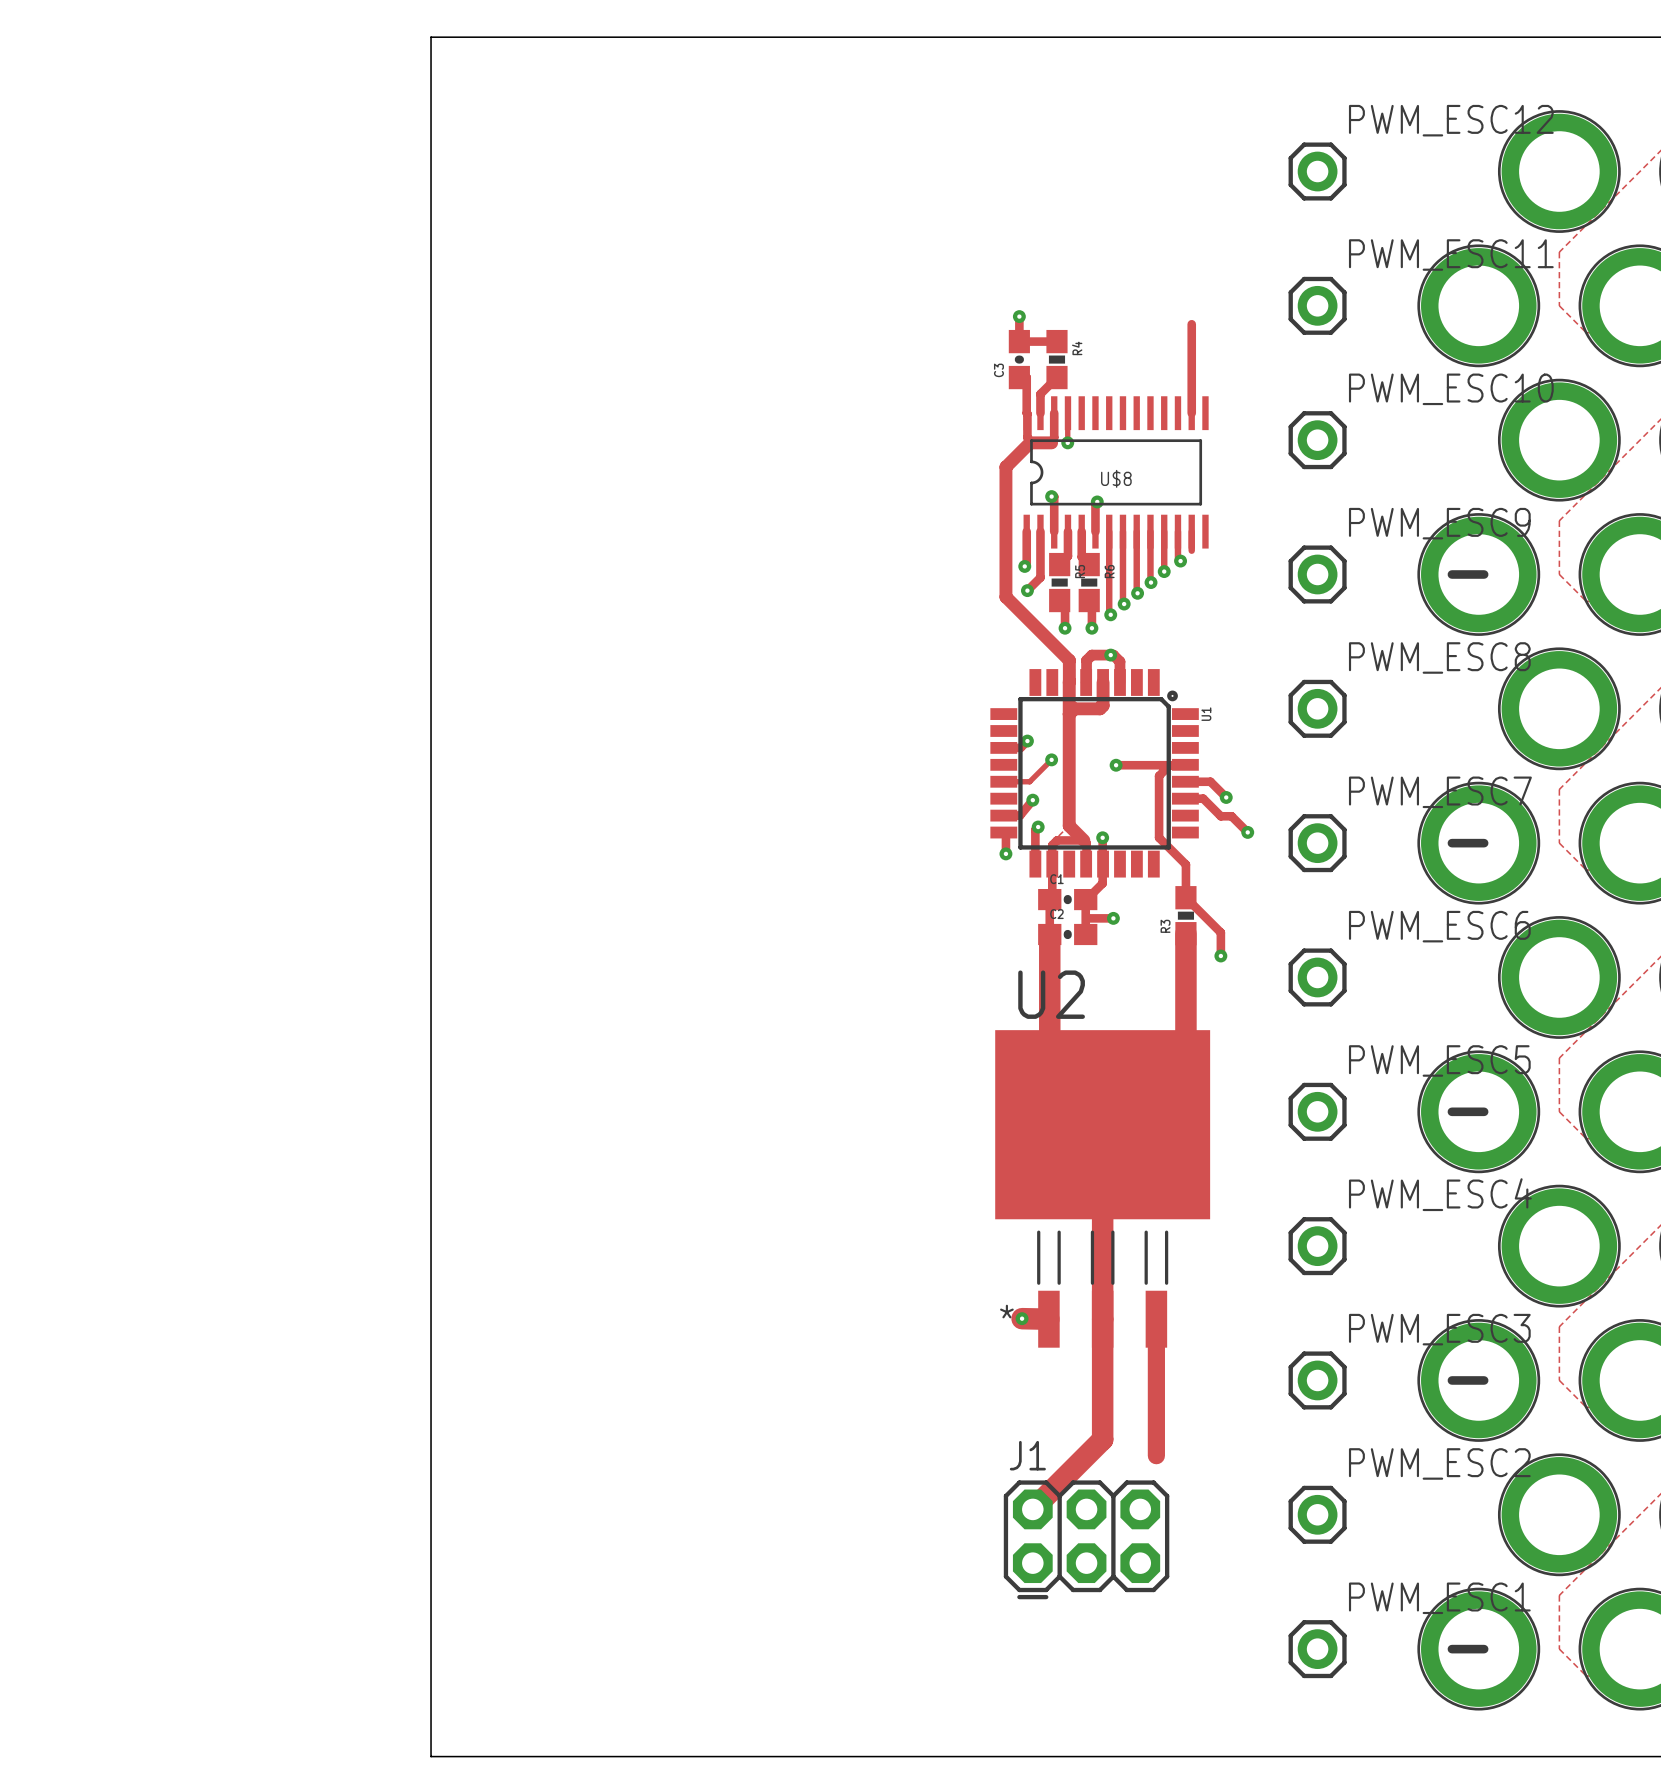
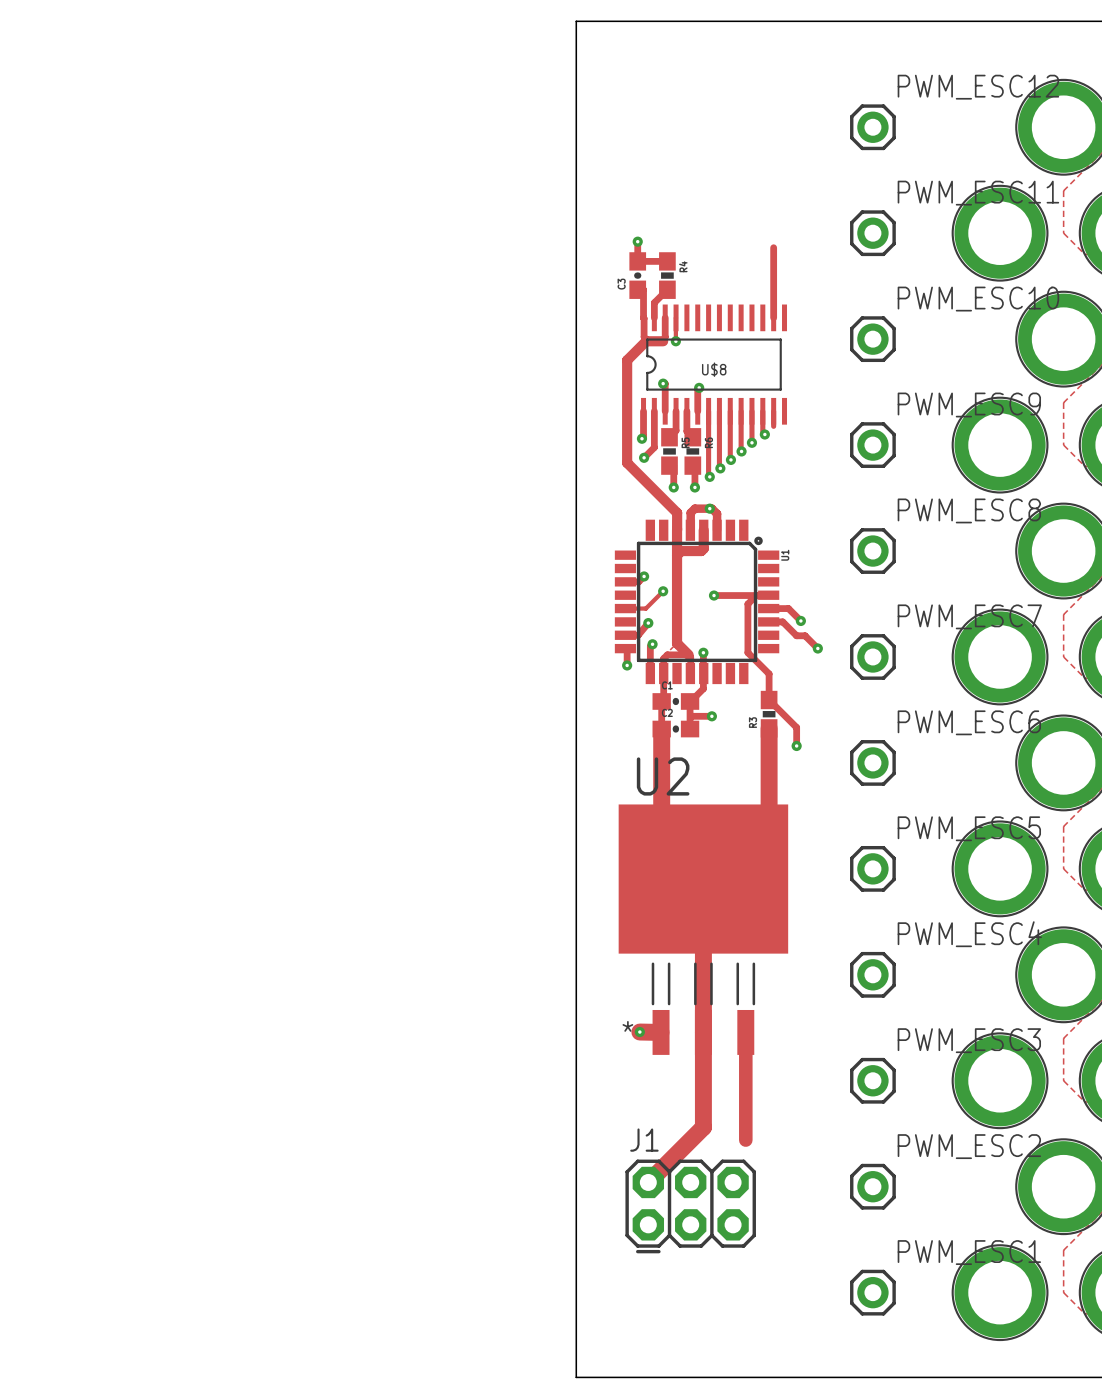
board edge: (941, 37) (431, 37) (431, 1756) (941, 1756) -> (576, 21) (576, 1377)
line: (1451, 574) (1484, 574) -> none
line: (1451, 843) (1484, 843) -> none
line: (1451, 1111) (1484, 1111) -> none
line: (1451, 1380) (1484, 1380) -> none
line: (1451, 1649) (1484, 1649) -> none

